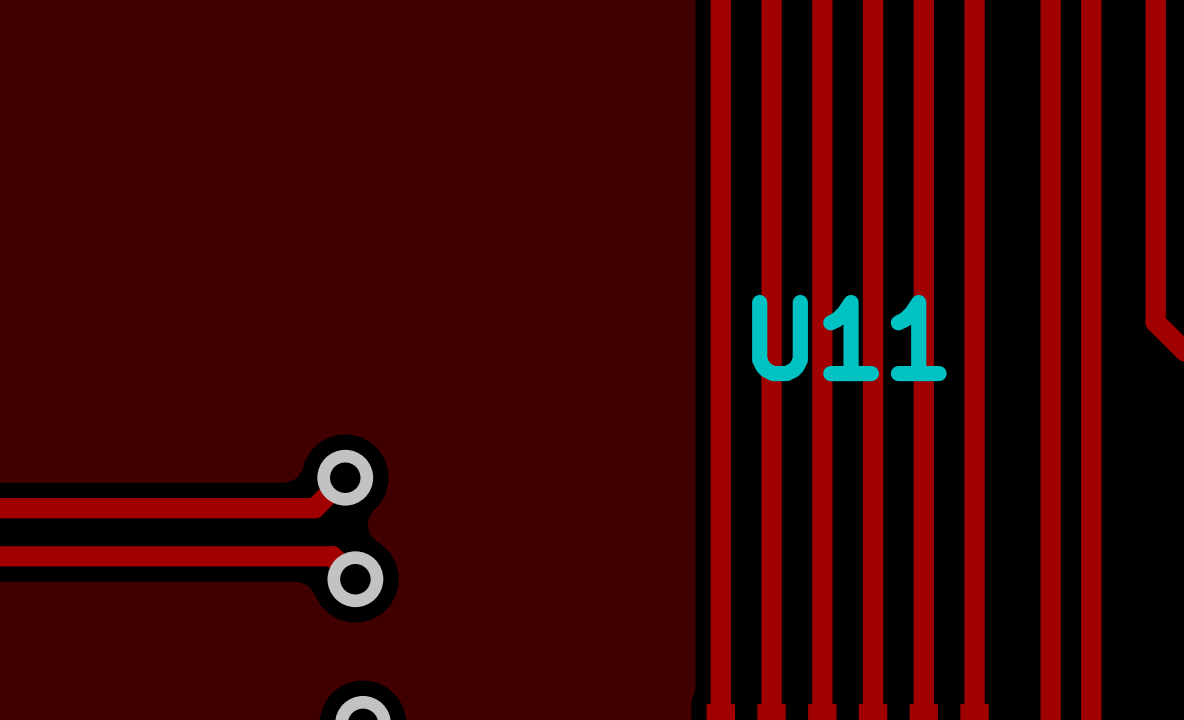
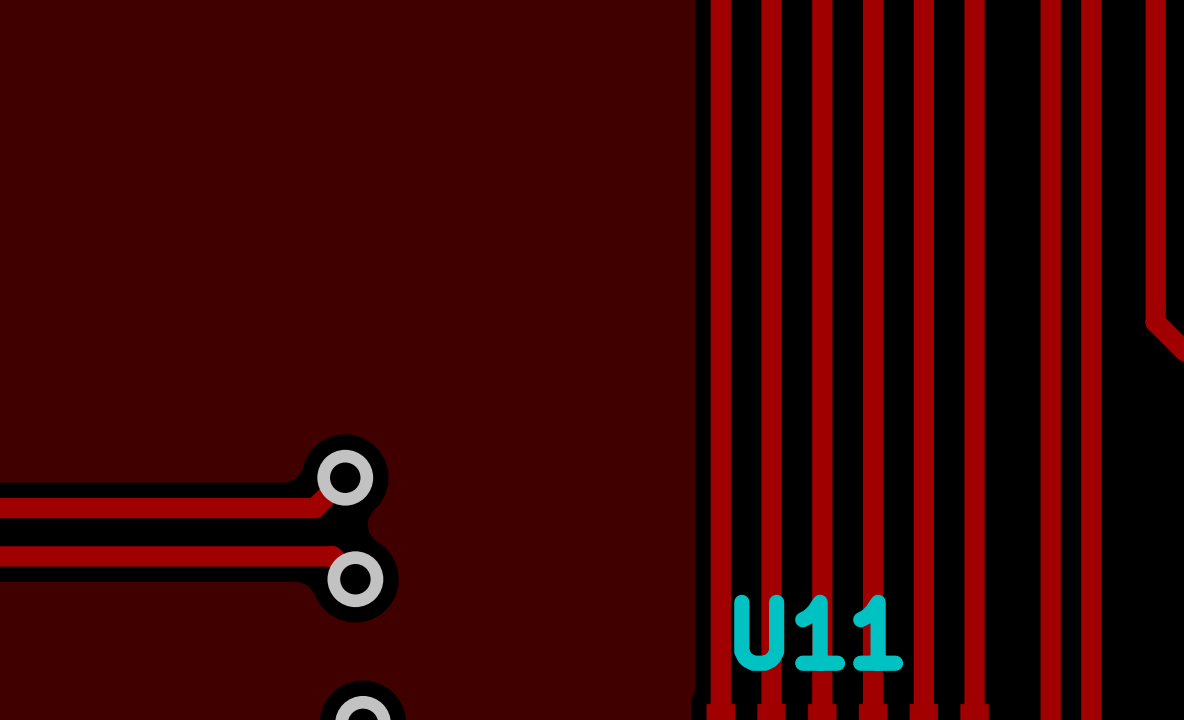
U11 name position: U11 (849, 338) -> U11 (818, 632)

